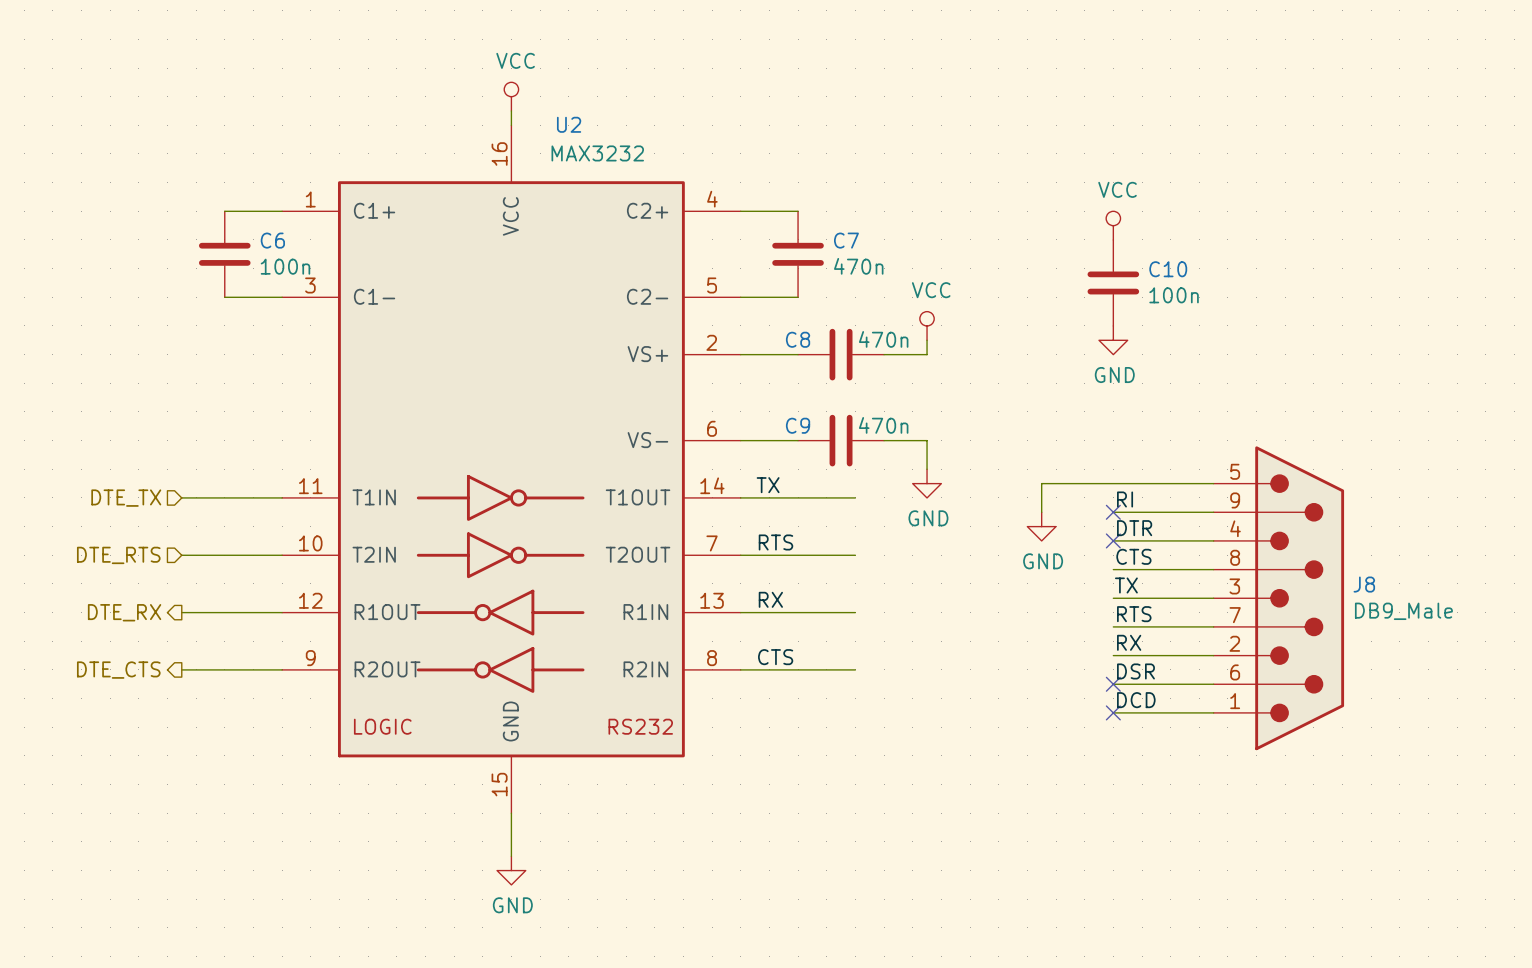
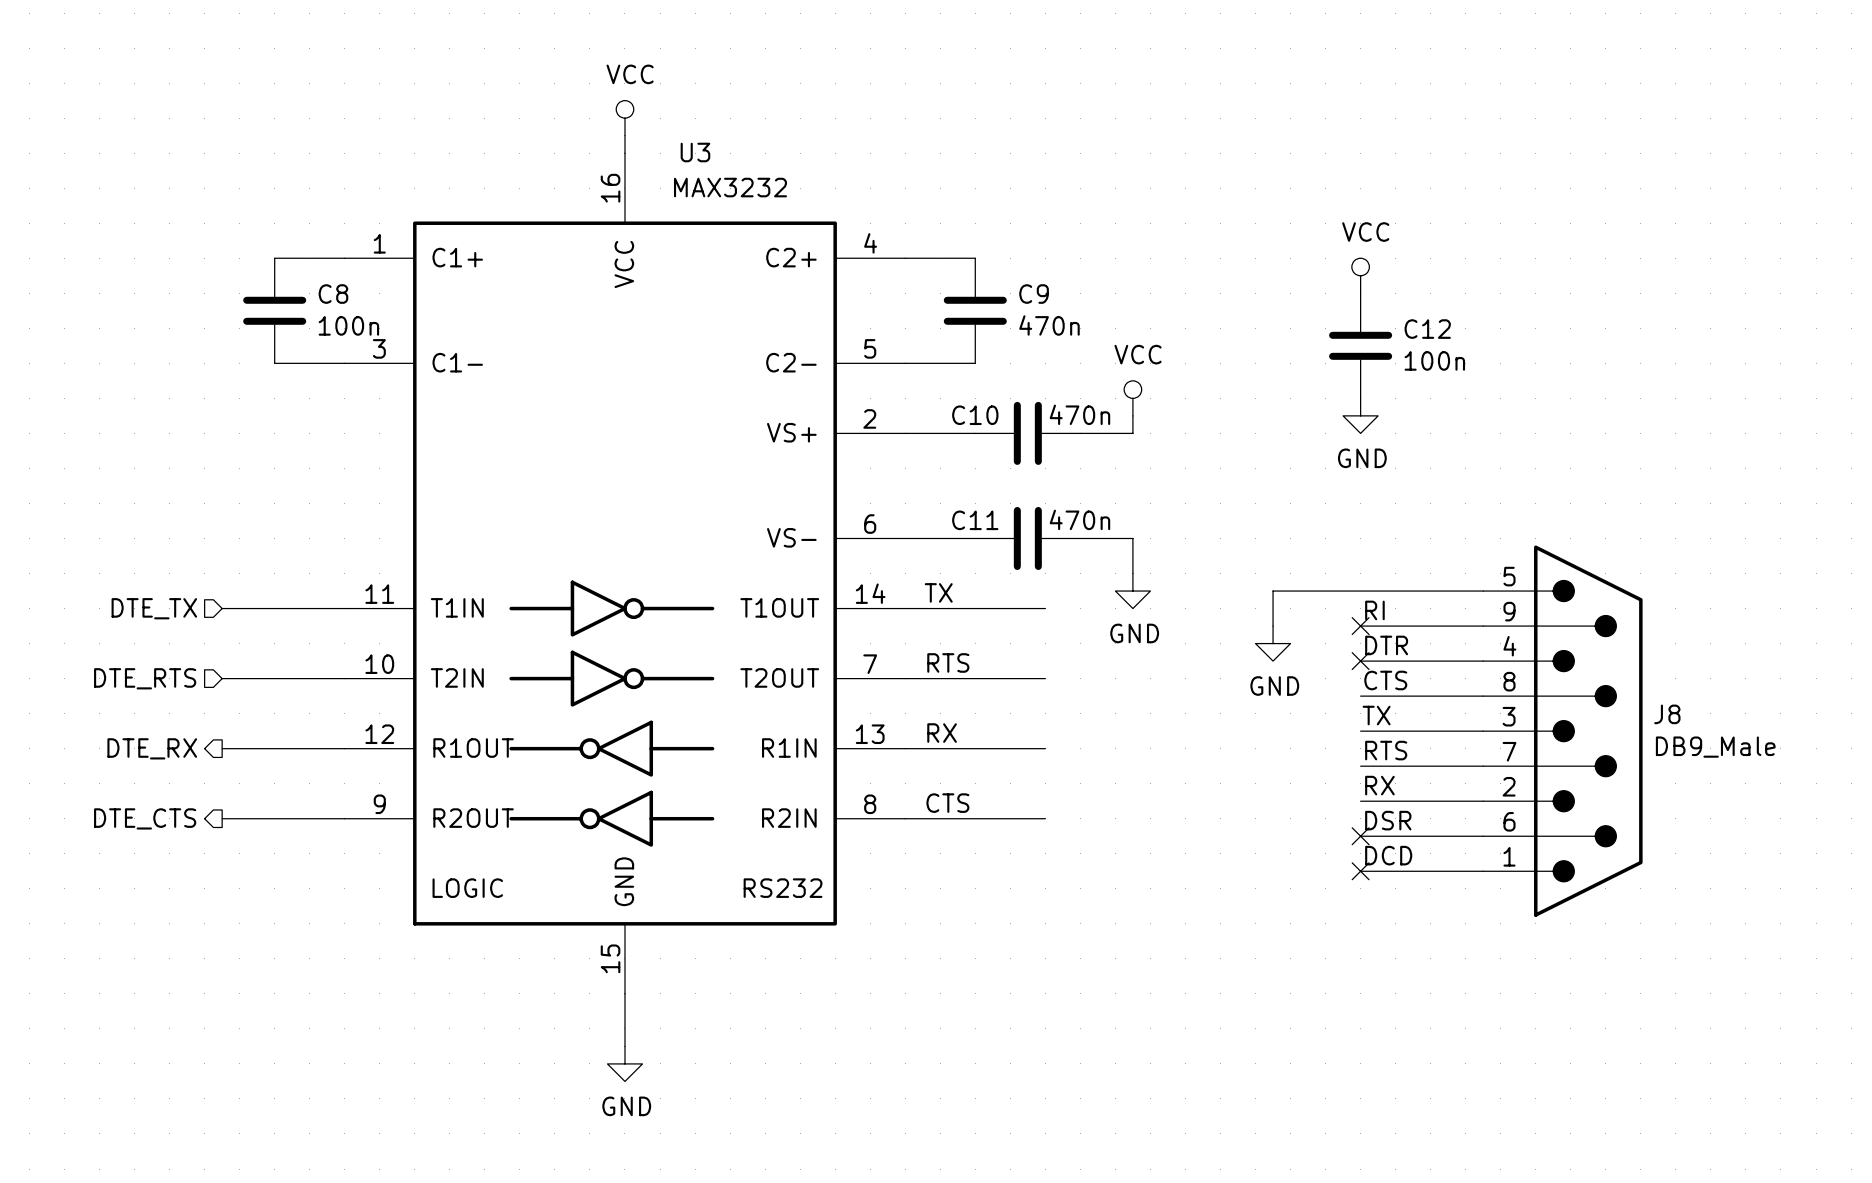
U2 name: U2 (569, 124) -> U3 (695, 152)
C6 name: C6 (272, 240) -> C8 (333, 294)
C7 name: C7 (846, 240) -> C9 (1034, 294)
C10 name: C10 (1168, 269) -> C12 (1427, 329)
C8 name: C8 (798, 339) -> C10 (975, 415)
C9 name: C9 (798, 425) -> C11 (975, 520)

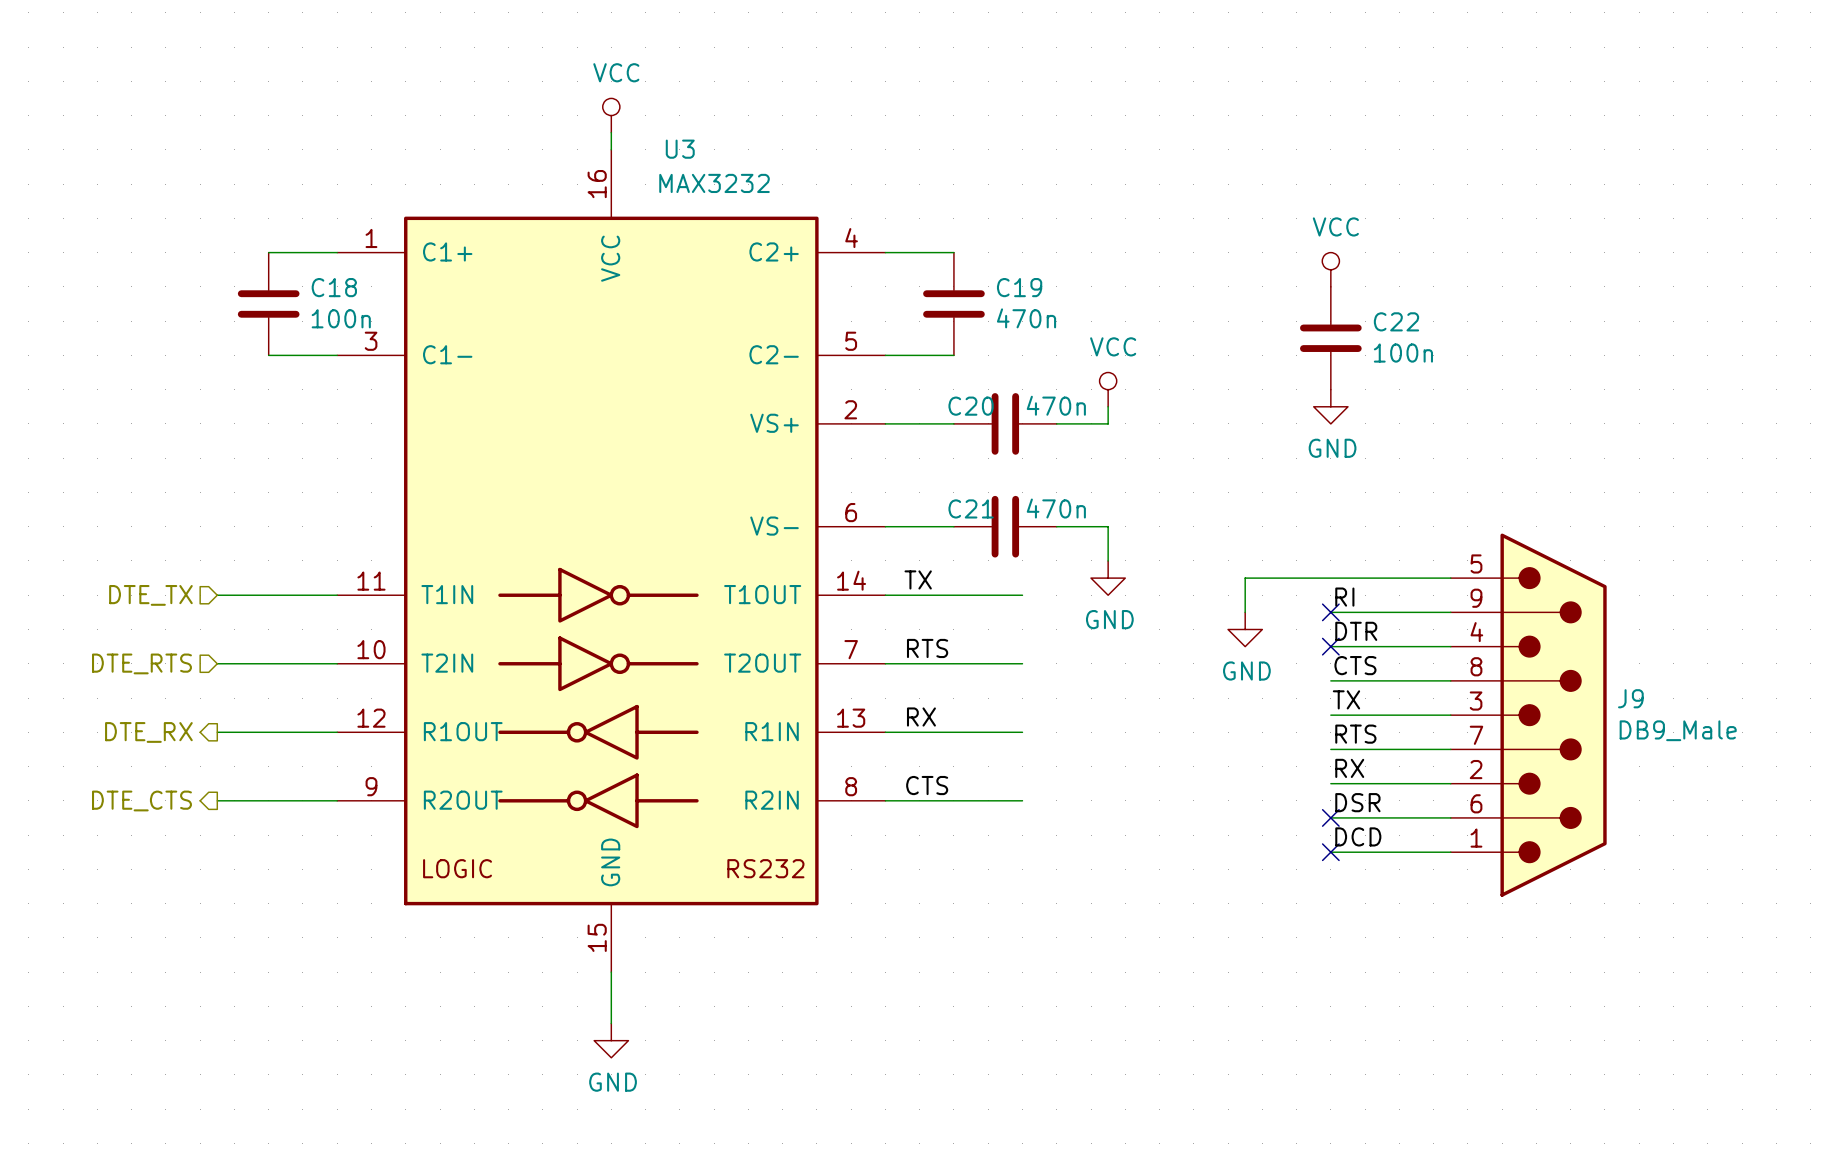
C8 name: C8 (333, 294) -> C18 (334, 287)
C9 name: C9 (1034, 294) -> C19 (1019, 287)
C12 name: C12 (1427, 329) -> C22 (1396, 321)
C10 name: C10 (975, 415) -> C20 (971, 406)
C11 name: C11 (975, 520) -> C21 (971, 508)
J8 name: J8 (1667, 714) -> J9 (1630, 698)

